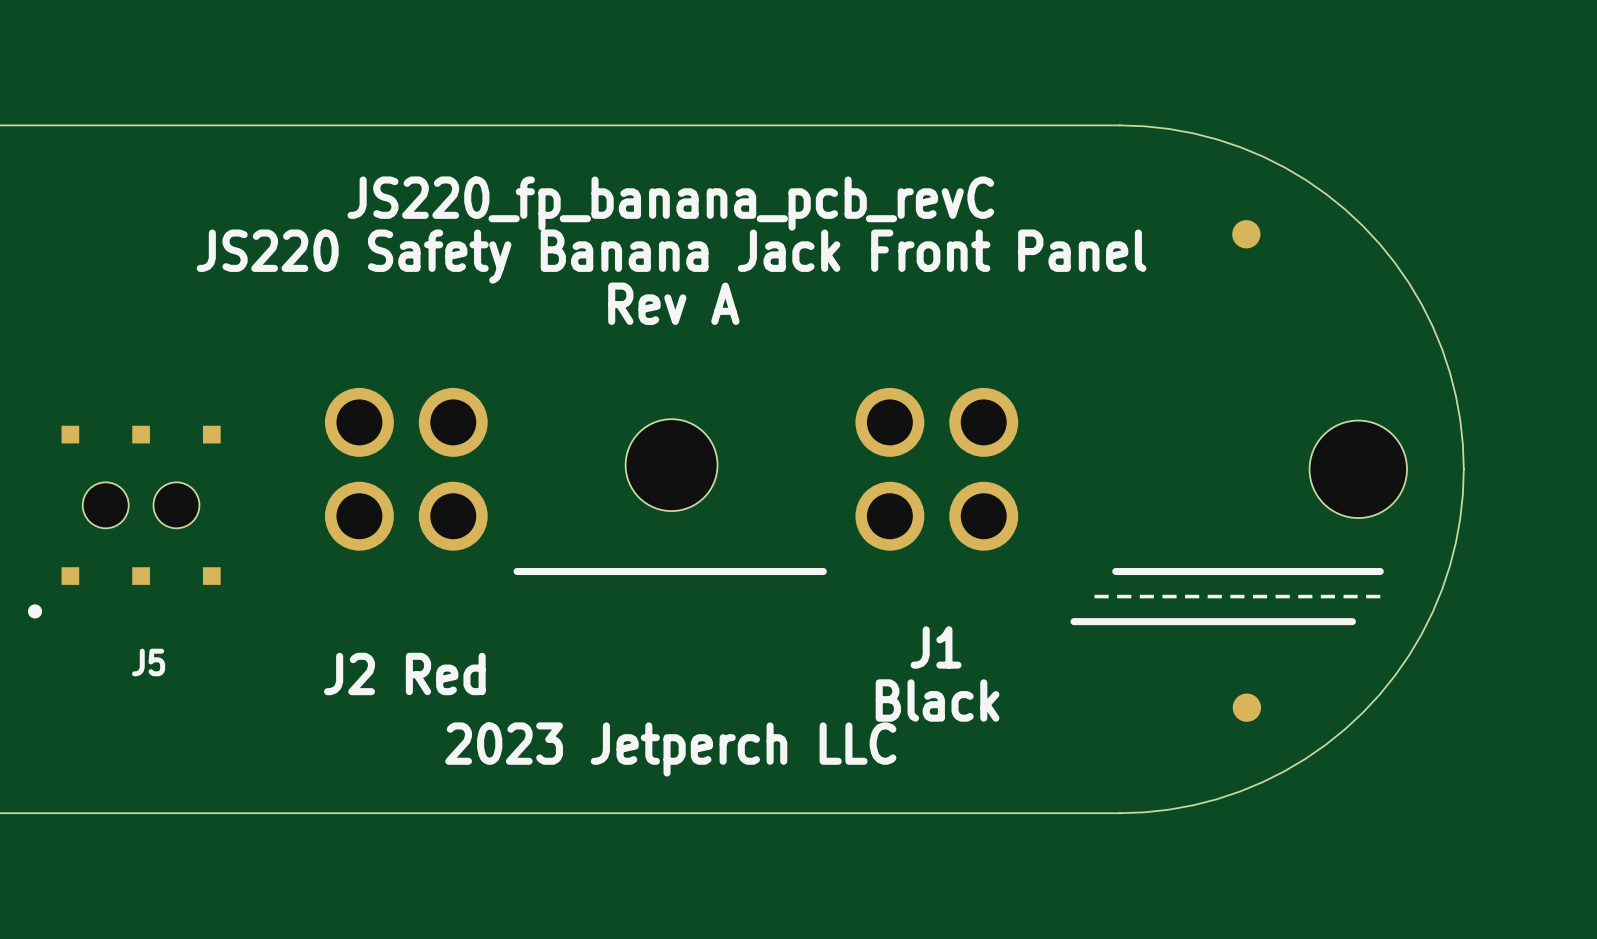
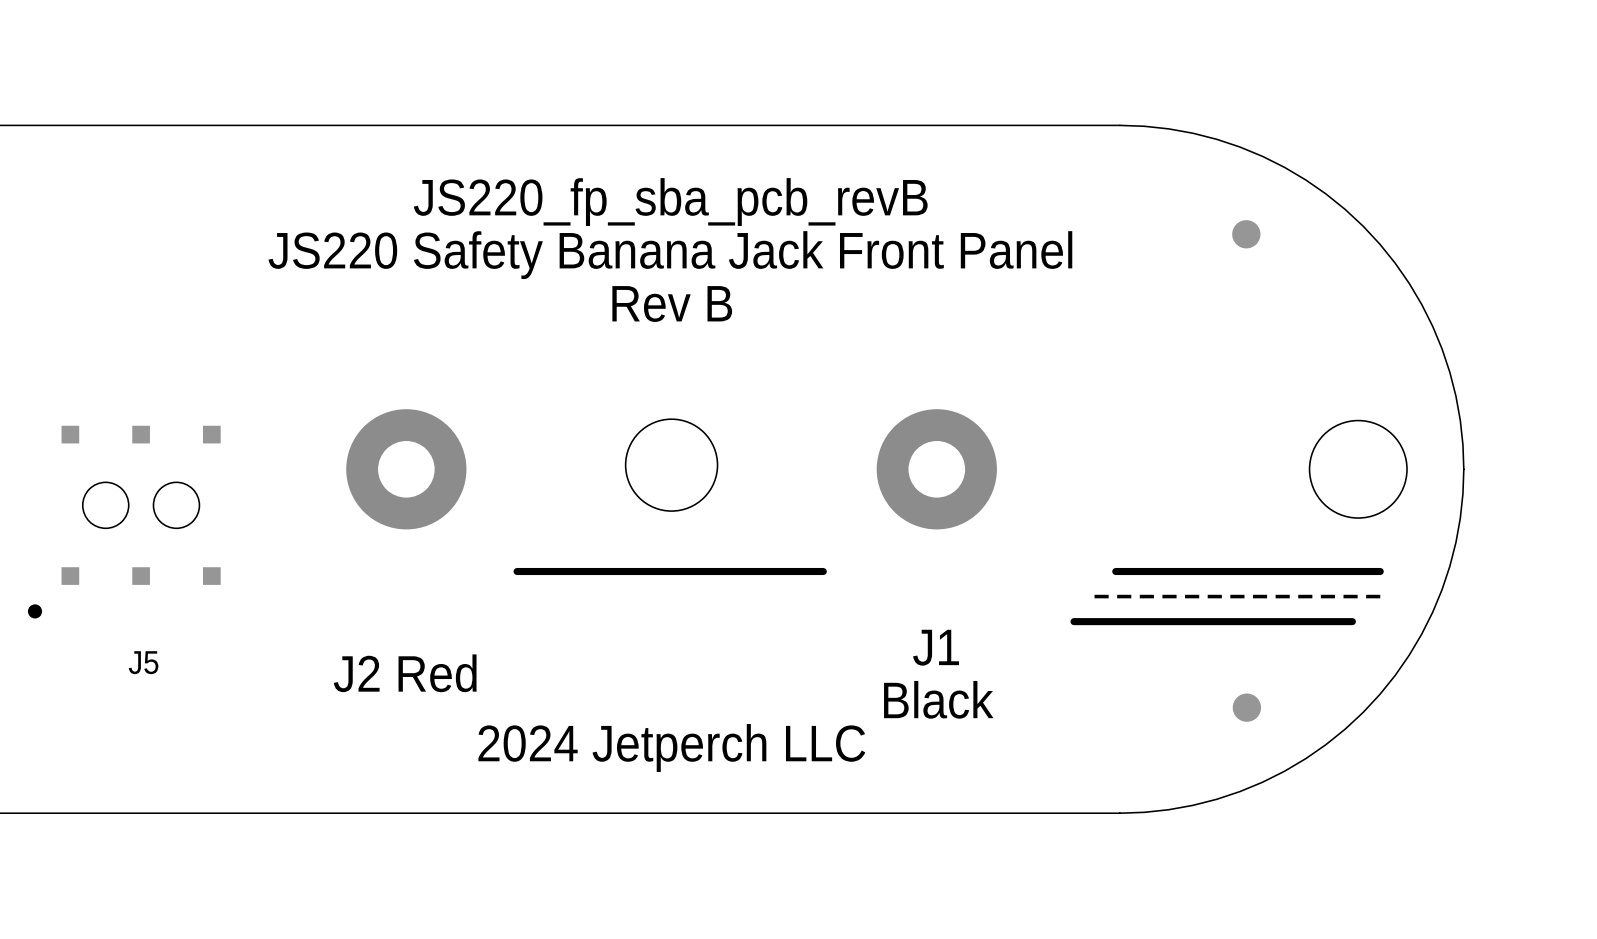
text: JS220_fp_banana_pcb_revC (670, 203) -> JS220_fp_sba_pcb_revB (670, 202)
text: Rev A (673, 303) -> Rev B (672, 304)
part footprint: [324, 387, 488, 551] -> [346, 409, 467, 530]
part footprint: [855, 387, 1019, 551] -> [876, 409, 997, 530]
text: 2023 Jetperch LLC (670, 749) -> 2024 Jetperch LLC (671, 747)

